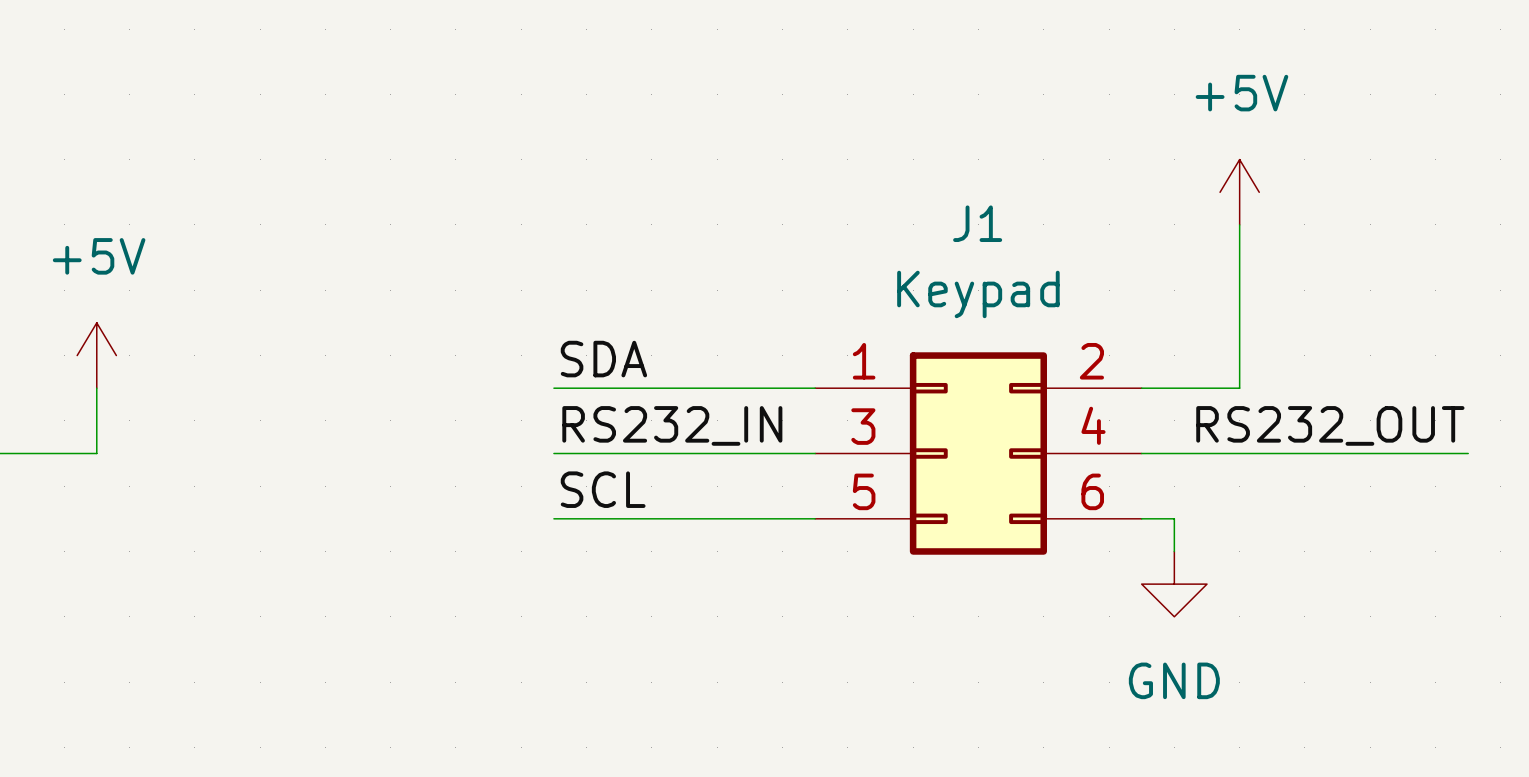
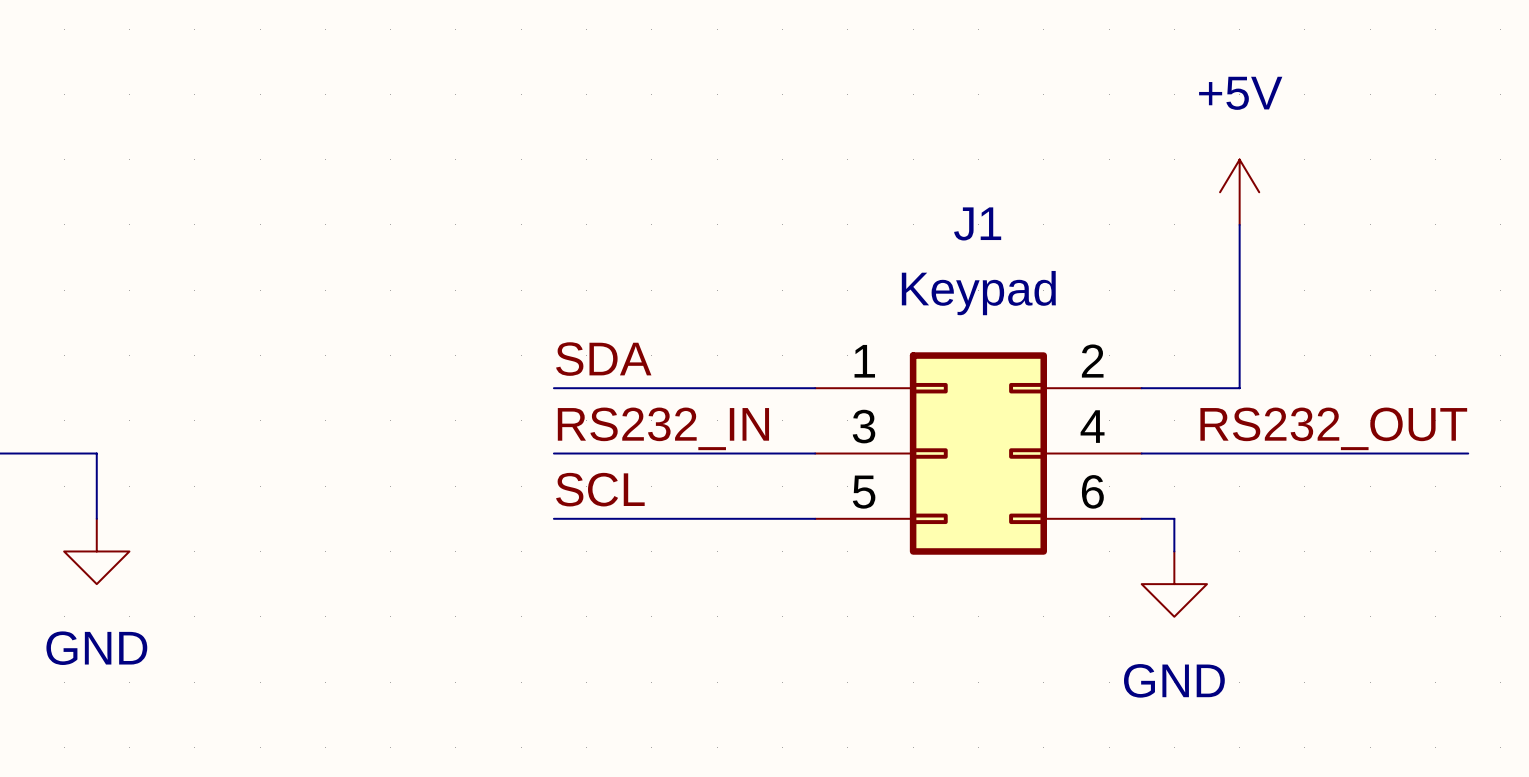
power symbol: +5V (96, 355) -> none
wire: (96, 388) (96, 453) -> (96, 518) (96, 453)
power symbol: none -> GND (96, 551)

